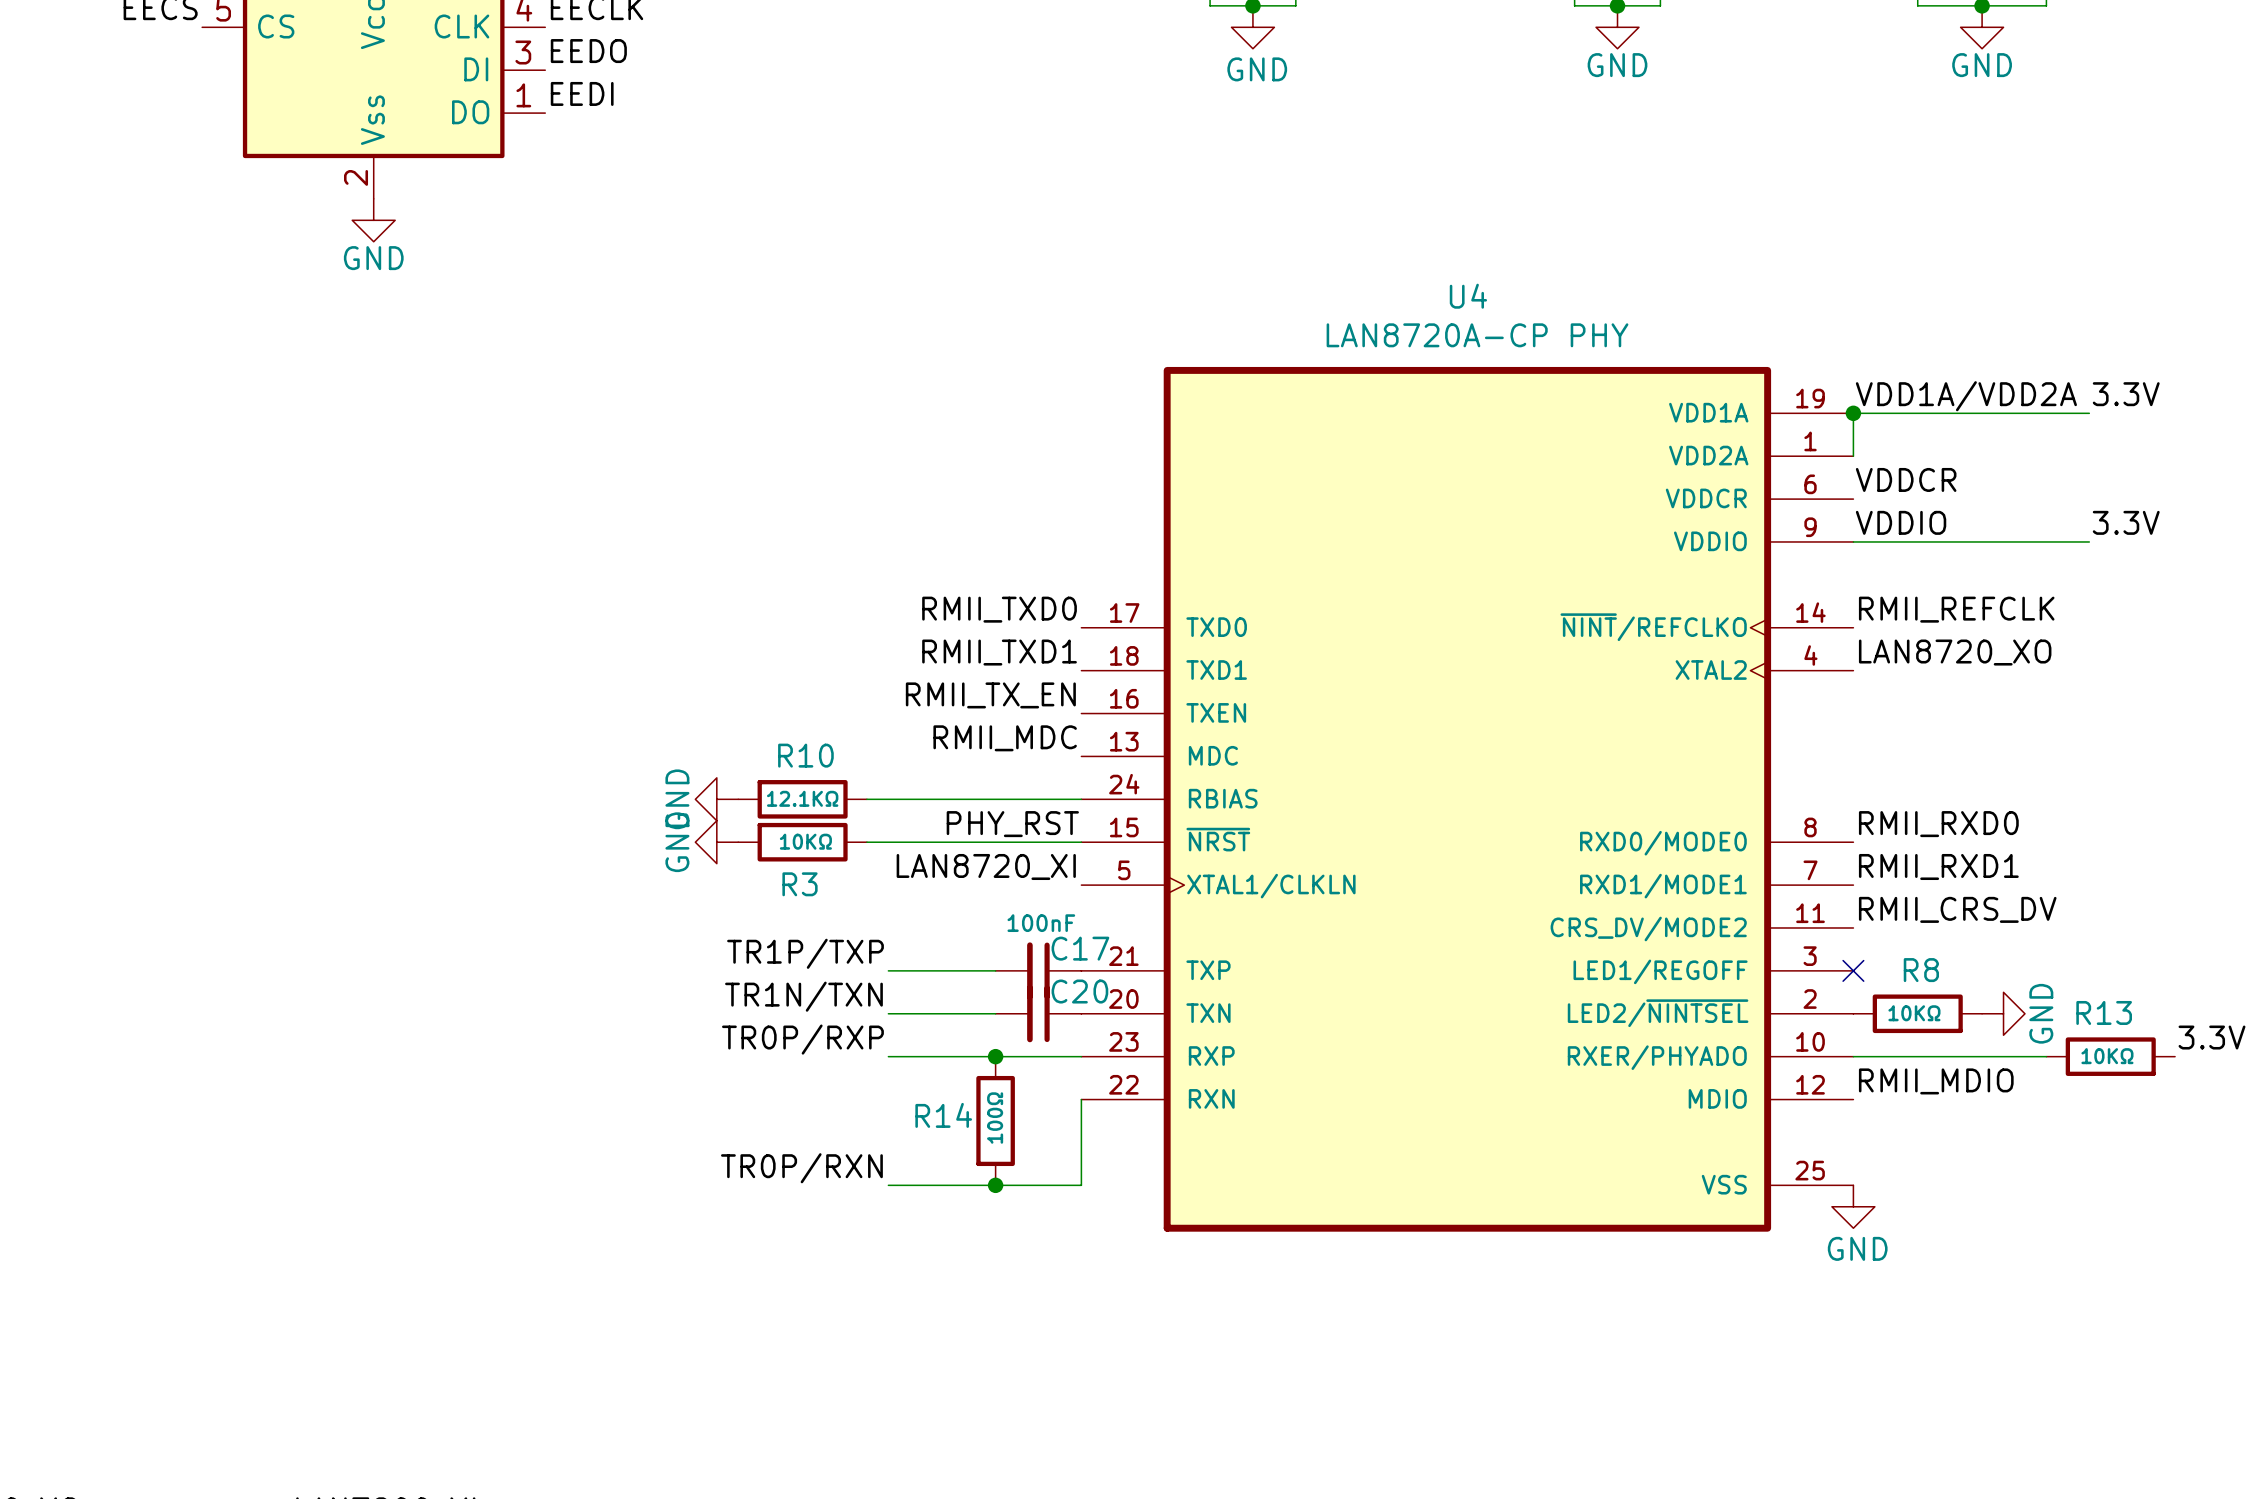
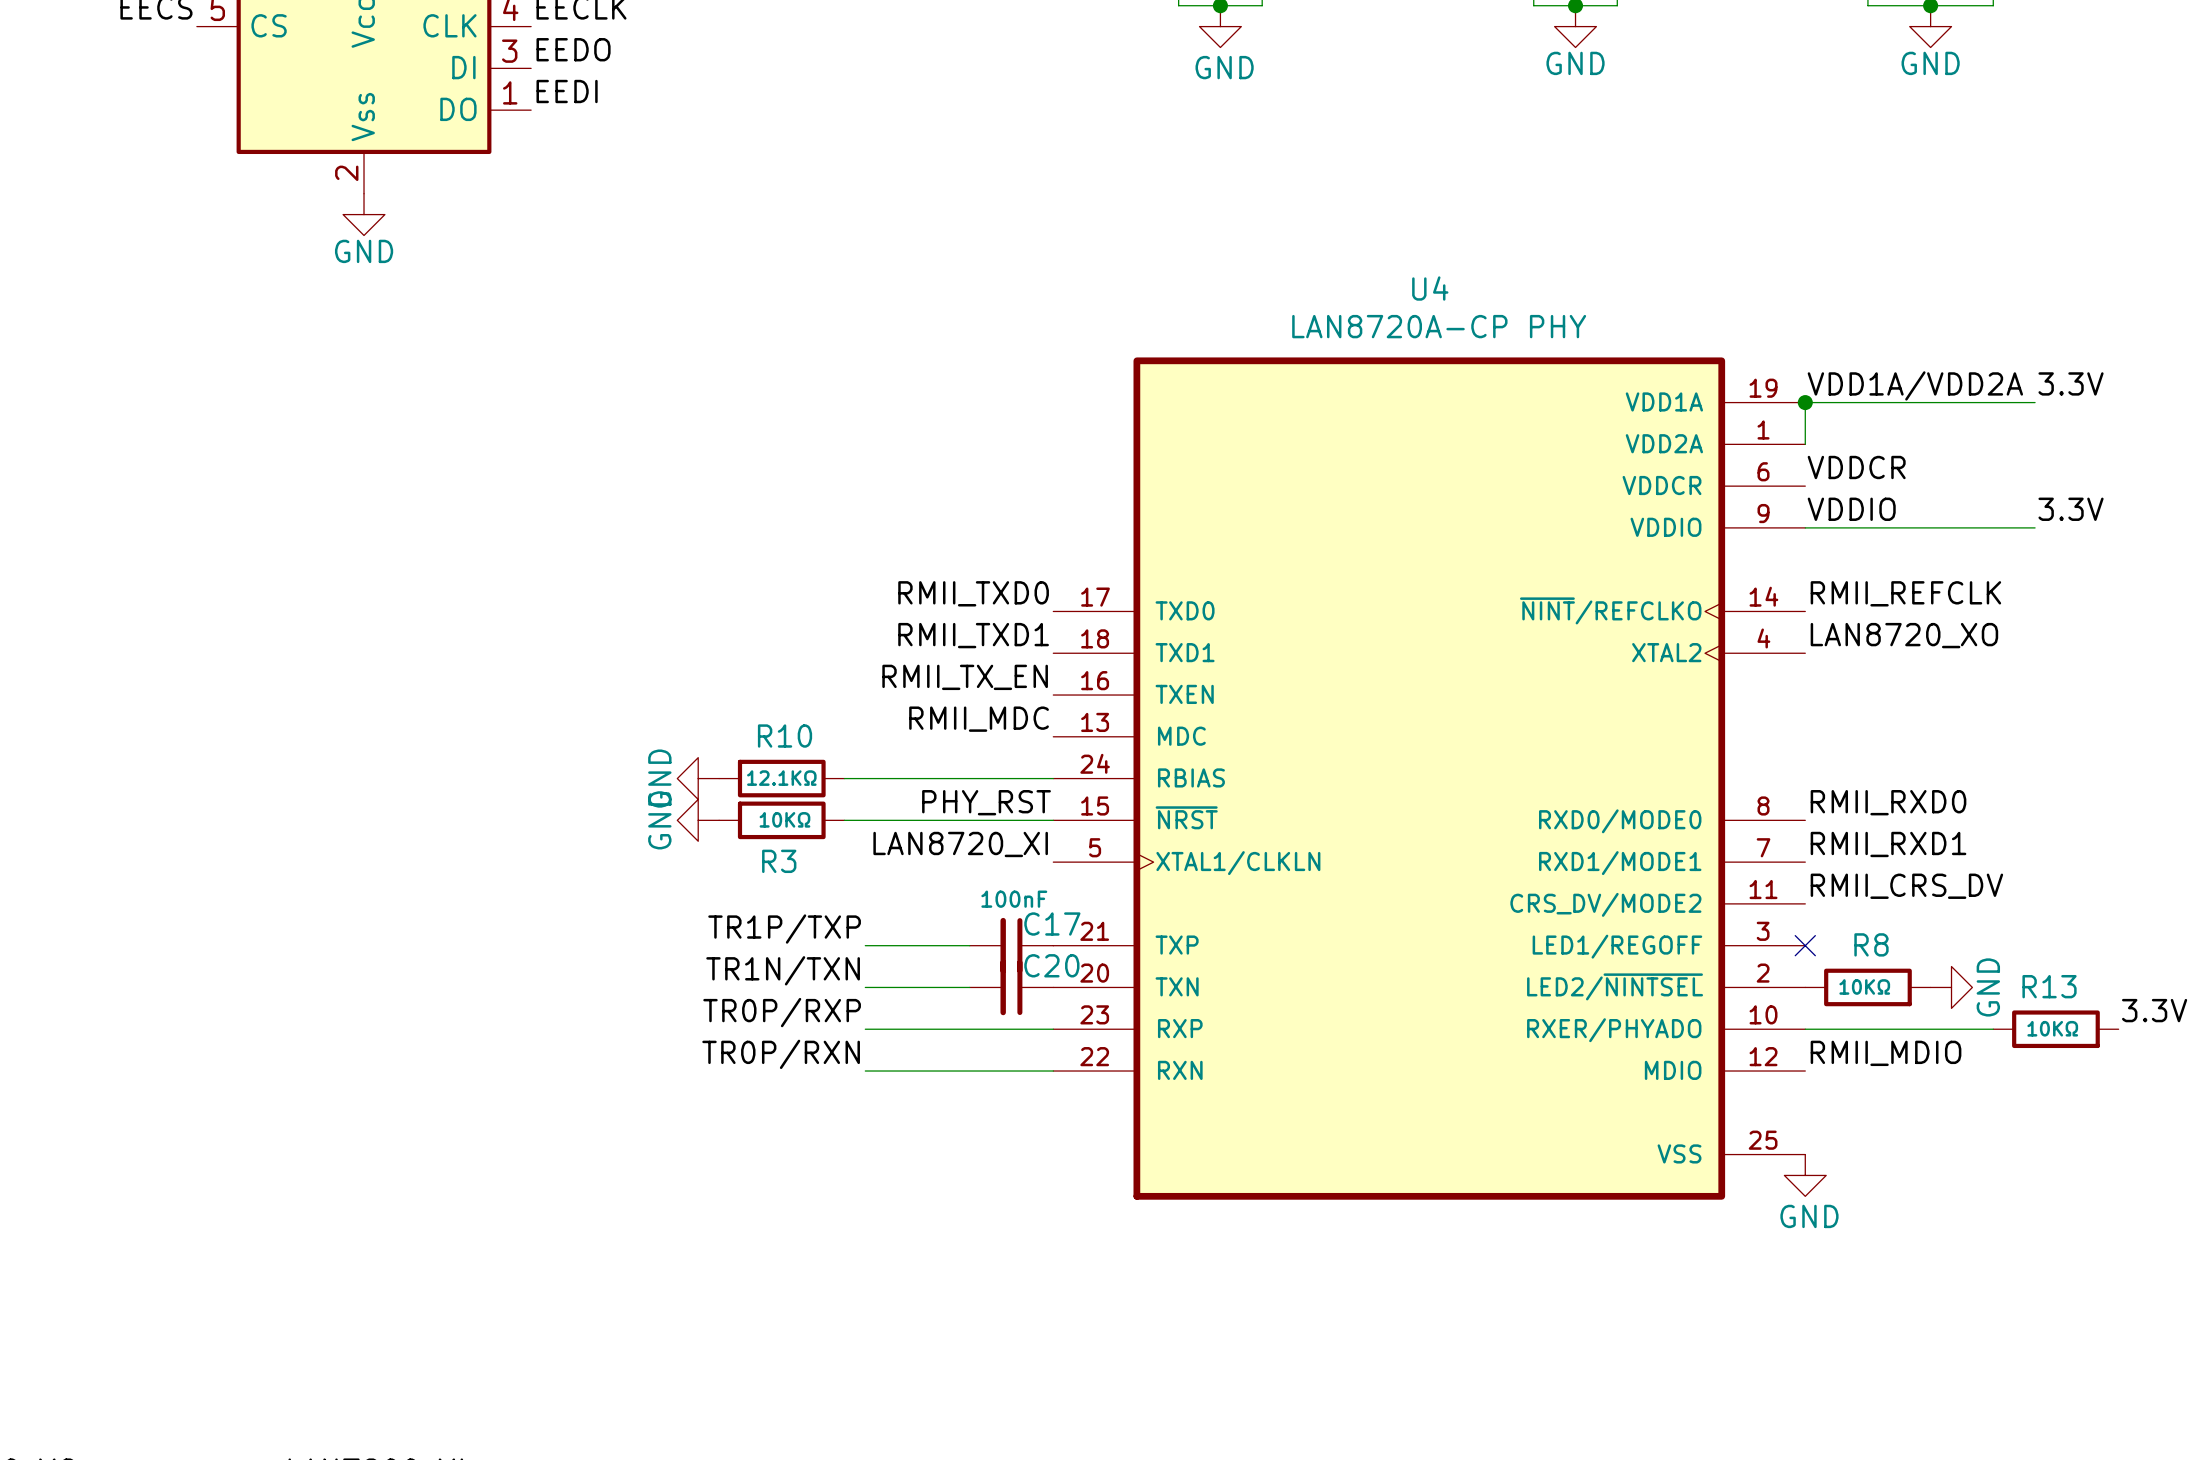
junction: (995, 1056) -> none
wire: (1081, 1099) (1081, 1185) (888, 1185) -> (1053, 1071) (865, 1071)
R14: 100Ω (995, 1121) -> none
label position: TR0P/RXN (801, 1168) -> TR0P/RXN (781, 1054)
junction: (995, 1185) -> none

